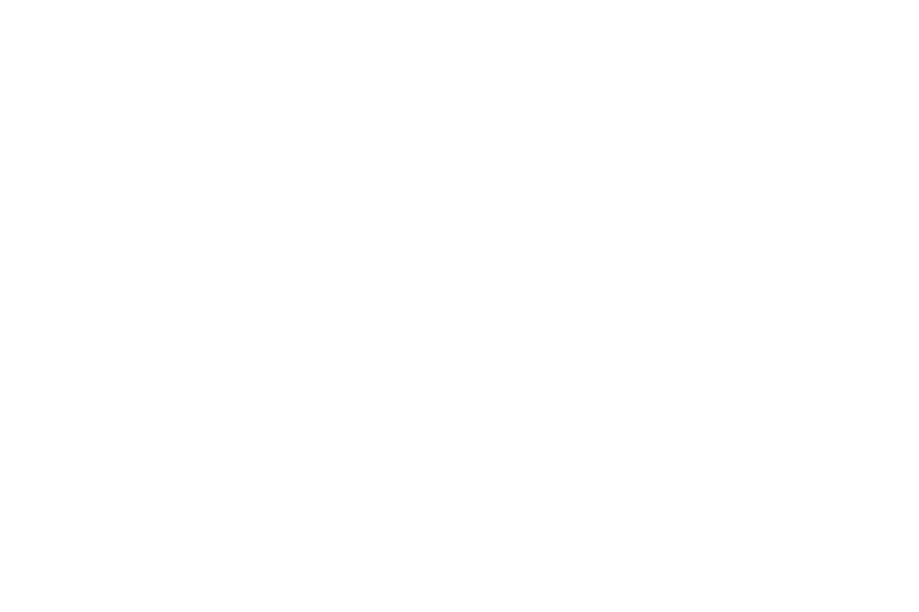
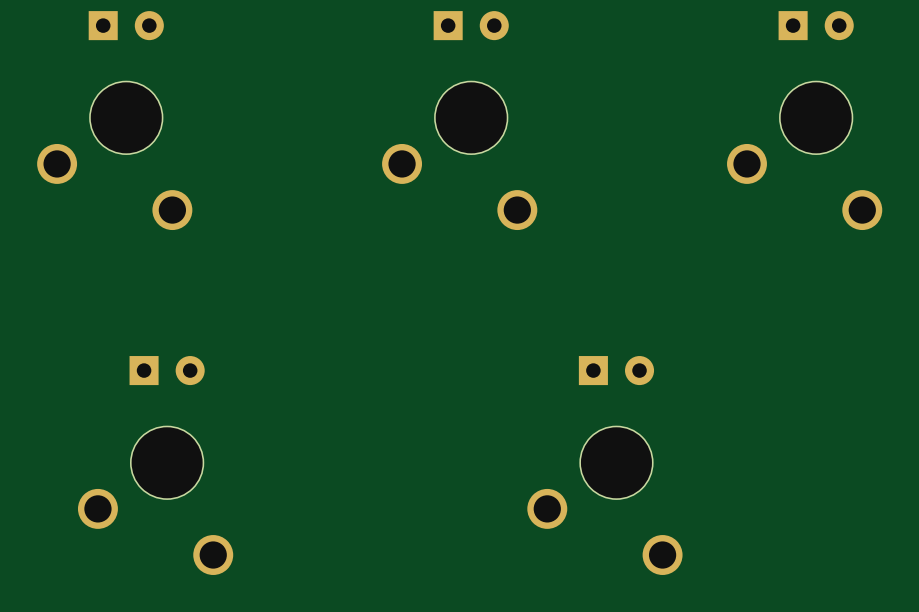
part: none -> (114, 120)
part: none -> (459, 120)
part: none -> (804, 120)
part: none -> (155, 465)
part: none -> (604, 465)

